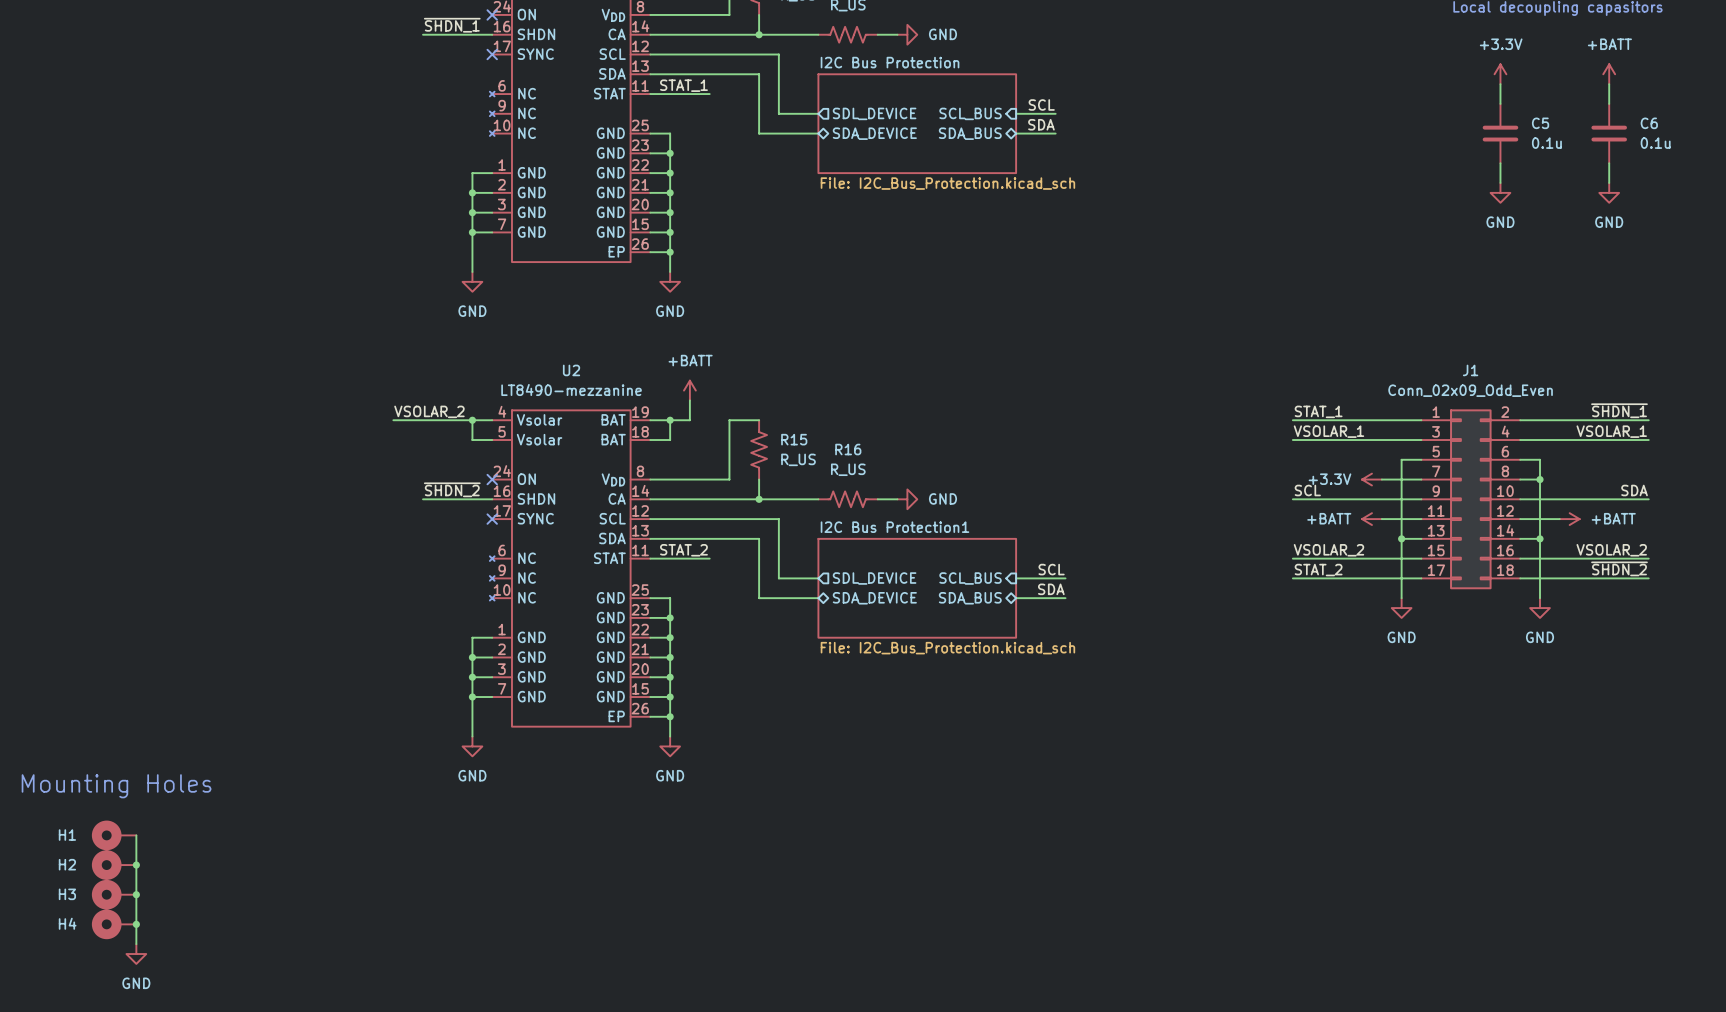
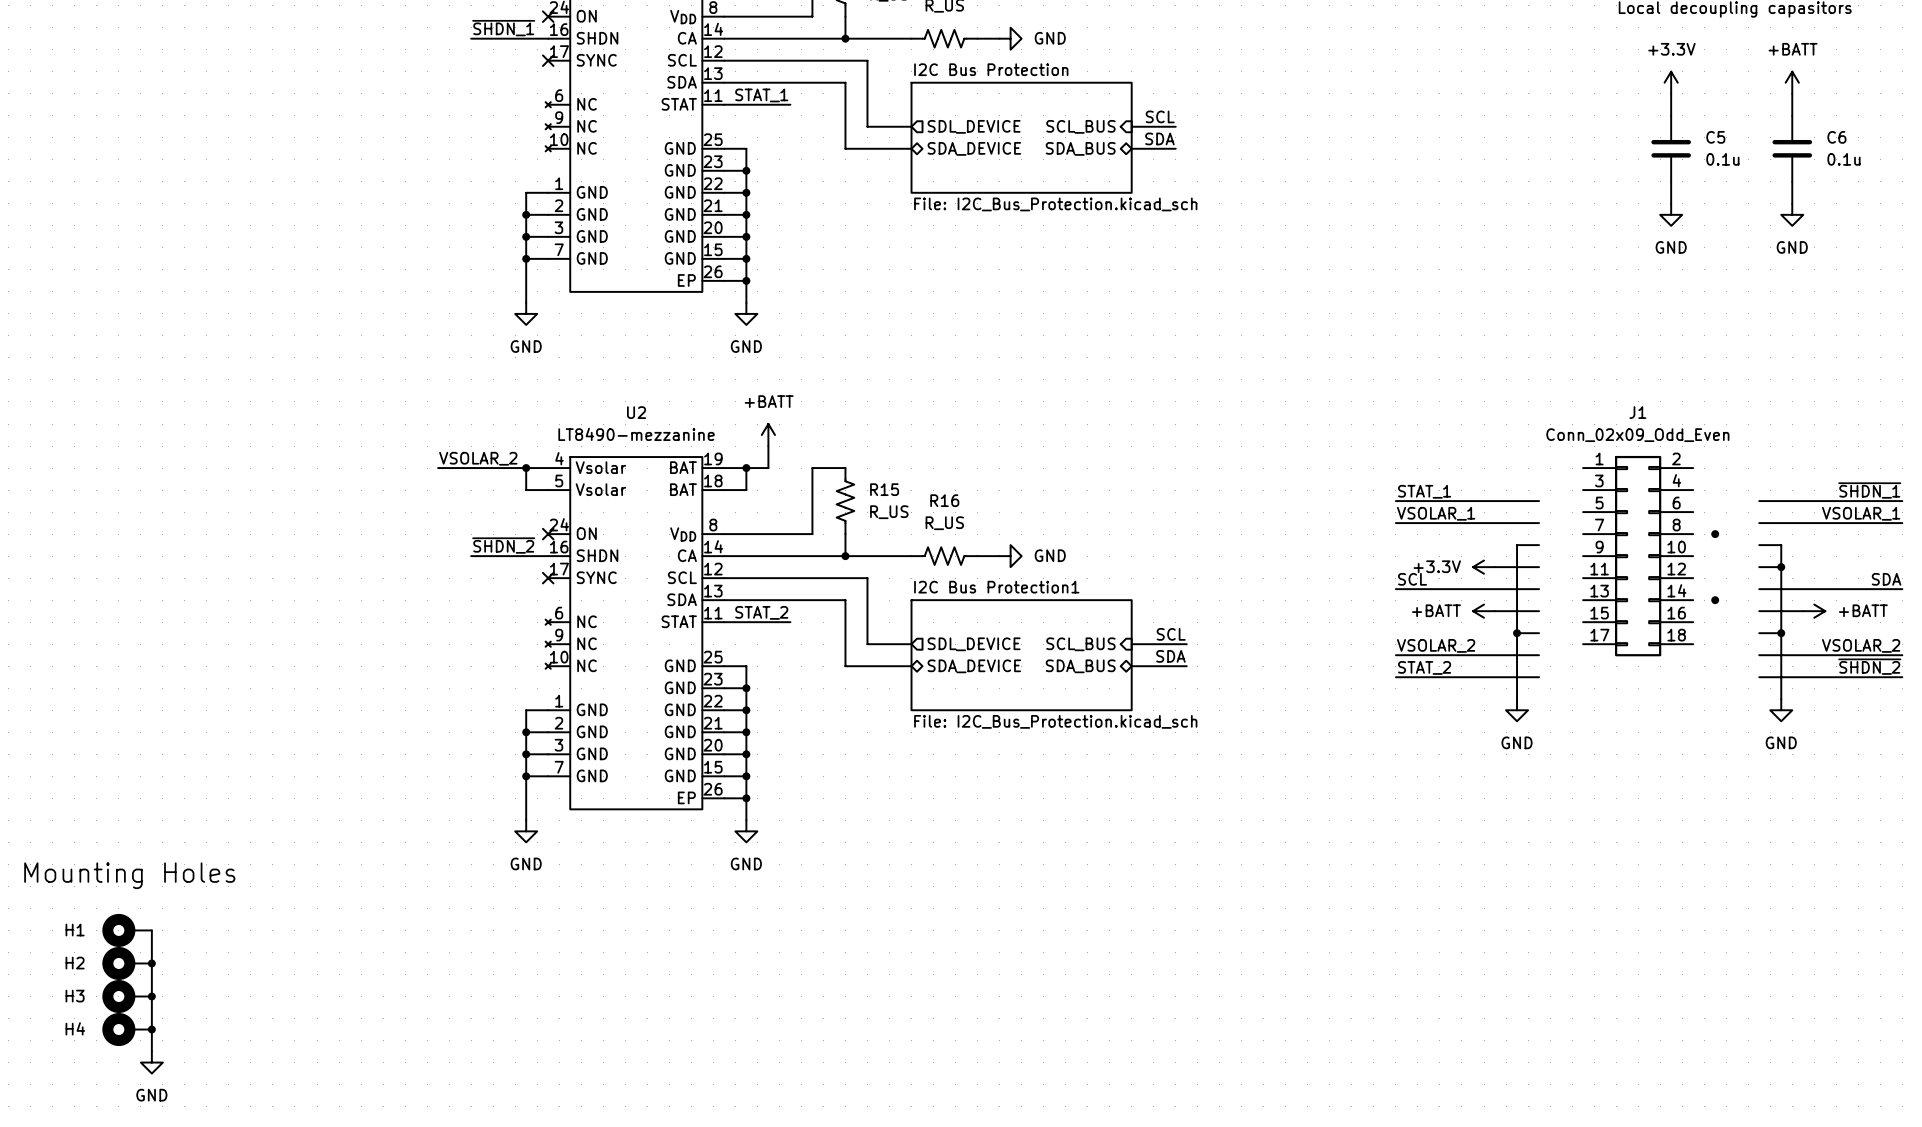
label position: ~{SHDN_1} (1619, 410) -> ~{SHDN_1} (1869, 490)
label position: STAT_1 (1318, 411) -> STAT_1 (1424, 491)
wire: (1292, 420) (1421, 420) -> (1395, 501) (1539, 501)
wire: (1520, 420) (1648, 420) -> (1759, 501) (1902, 501)
label position: VSOLAR_1 (1328, 431) -> VSOLAR_1 (1436, 513)
label position: VSOLAR_1 (1611, 431) -> VSOLAR_1 (1861, 513)
wire: (1292, 440) (1421, 440) -> (1395, 523) (1539, 523)
wire: (1520, 440) (1648, 440) -> (1759, 523) (1902, 523)
wire: (1421, 459) (1401, 459) (1401, 598) -> (1539, 545) (1517, 545) (1517, 699)
wire: (1520, 459) (1540, 459) (1540, 598) -> (1759, 545) (1781, 545) (1781, 699)
power symbol position: +3.3V (1371, 479) -> +3.3V (1484, 567)
wire: (1381, 479) (1421, 479) -> (1495, 567) (1539, 567)
wire: (1520, 479) (1540, 479) -> (1759, 567) (1781, 567)
label position: SCL (1307, 490) -> SCL (1412, 579)
label position: SDA (1634, 490) -> SDA (1886, 579)
wire: (1292, 499) (1421, 499) -> (1395, 589) (1539, 589)
wire: (1520, 499) (1648, 499) -> (1759, 589) (1902, 589)
junction: none -> (1781, 567)
power symbol position: +BATT (1371, 519) -> +BATT (1484, 611)
wire: (1381, 519) (1421, 519) -> (1495, 611) (1539, 611)
wire: (1520, 519) (1559, 519) -> (1759, 611) (1803, 611)
power symbol position: +BATT (1569, 519) -> +BATT (1814, 611)
wire: (1401, 538) (1421, 538) -> (1517, 633) (1539, 633)
junction: (1401, 538) -> none
wire: (1520, 538) (1540, 538) -> (1759, 633) (1781, 633)
label position: VSOLAR_2 (1328, 550) -> VSOLAR_2 (1436, 645)
label position: VSOLAR_2 (1611, 550) -> VSOLAR_2 (1861, 645)
wire: (1292, 558) (1421, 558) -> (1395, 655) (1539, 655)
wire: (1520, 558) (1648, 558) -> (1759, 655) (1902, 655)
junction: none -> (1517, 633)
junction: none -> (1781, 633)
label position: ~{SHDN_2} (1619, 568) -> ~{SHDN_2} (1869, 666)
label position: STAT_2 (1318, 570) -> STAT_2 (1424, 667)
wire: (1292, 578) (1421, 578) -> (1395, 677) (1539, 677)
wire: (1520, 578) (1648, 578) -> (1759, 677) (1902, 677)
power symbol position: GND (1401, 608) -> GND (1517, 710)
power symbol position: GND (1540, 608) -> GND (1781, 710)

